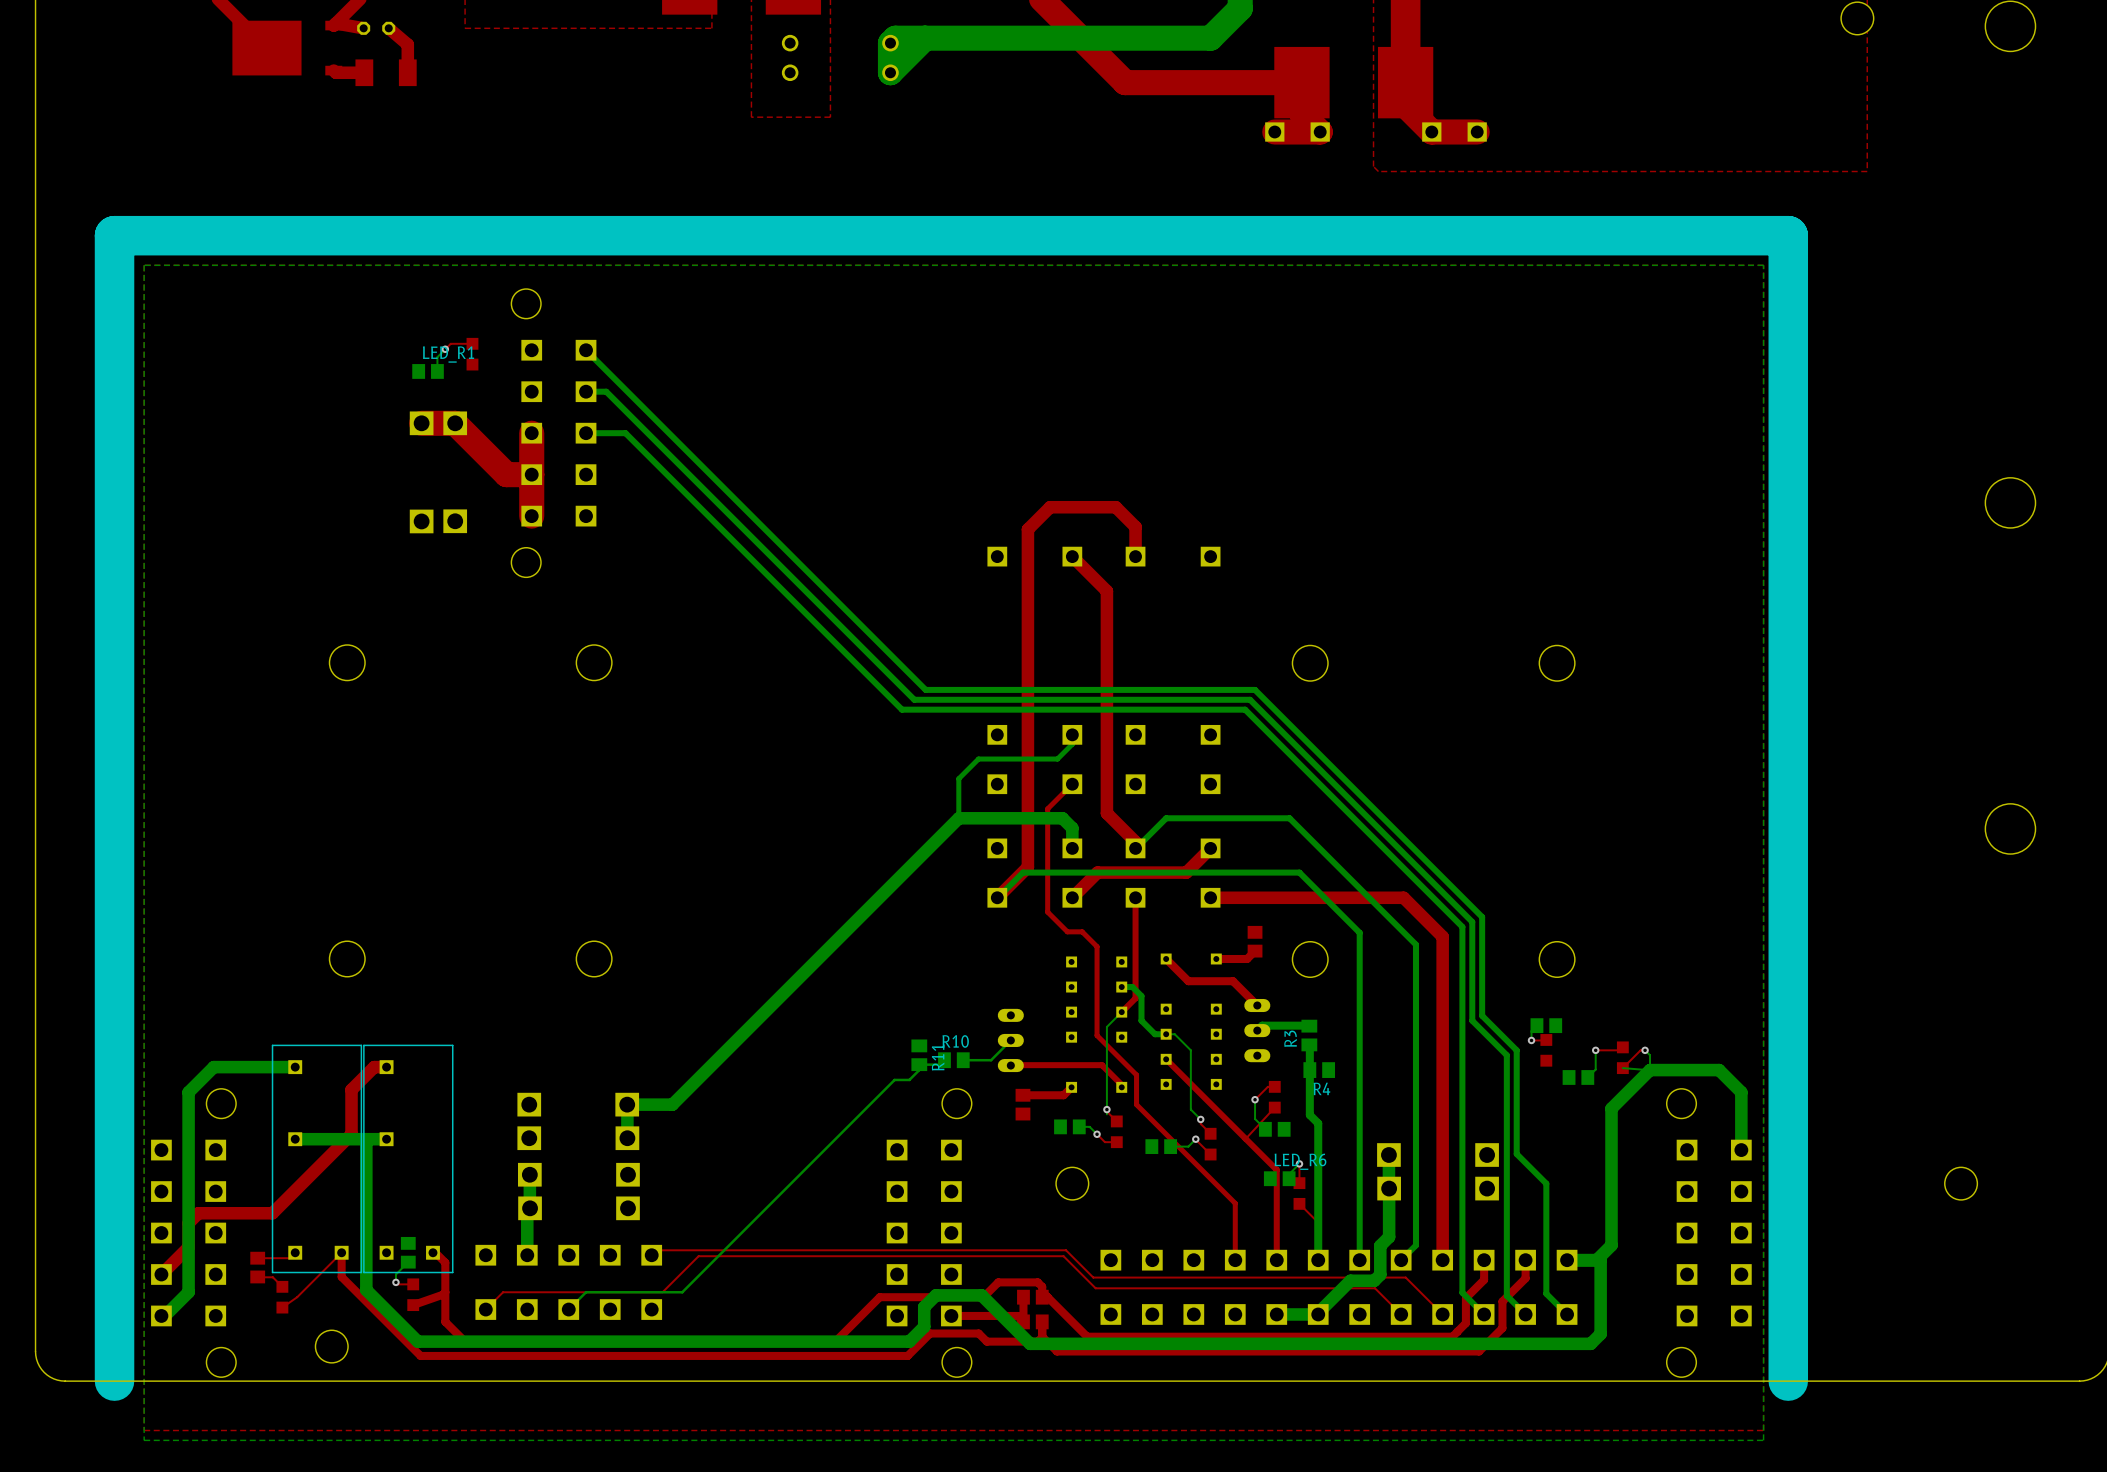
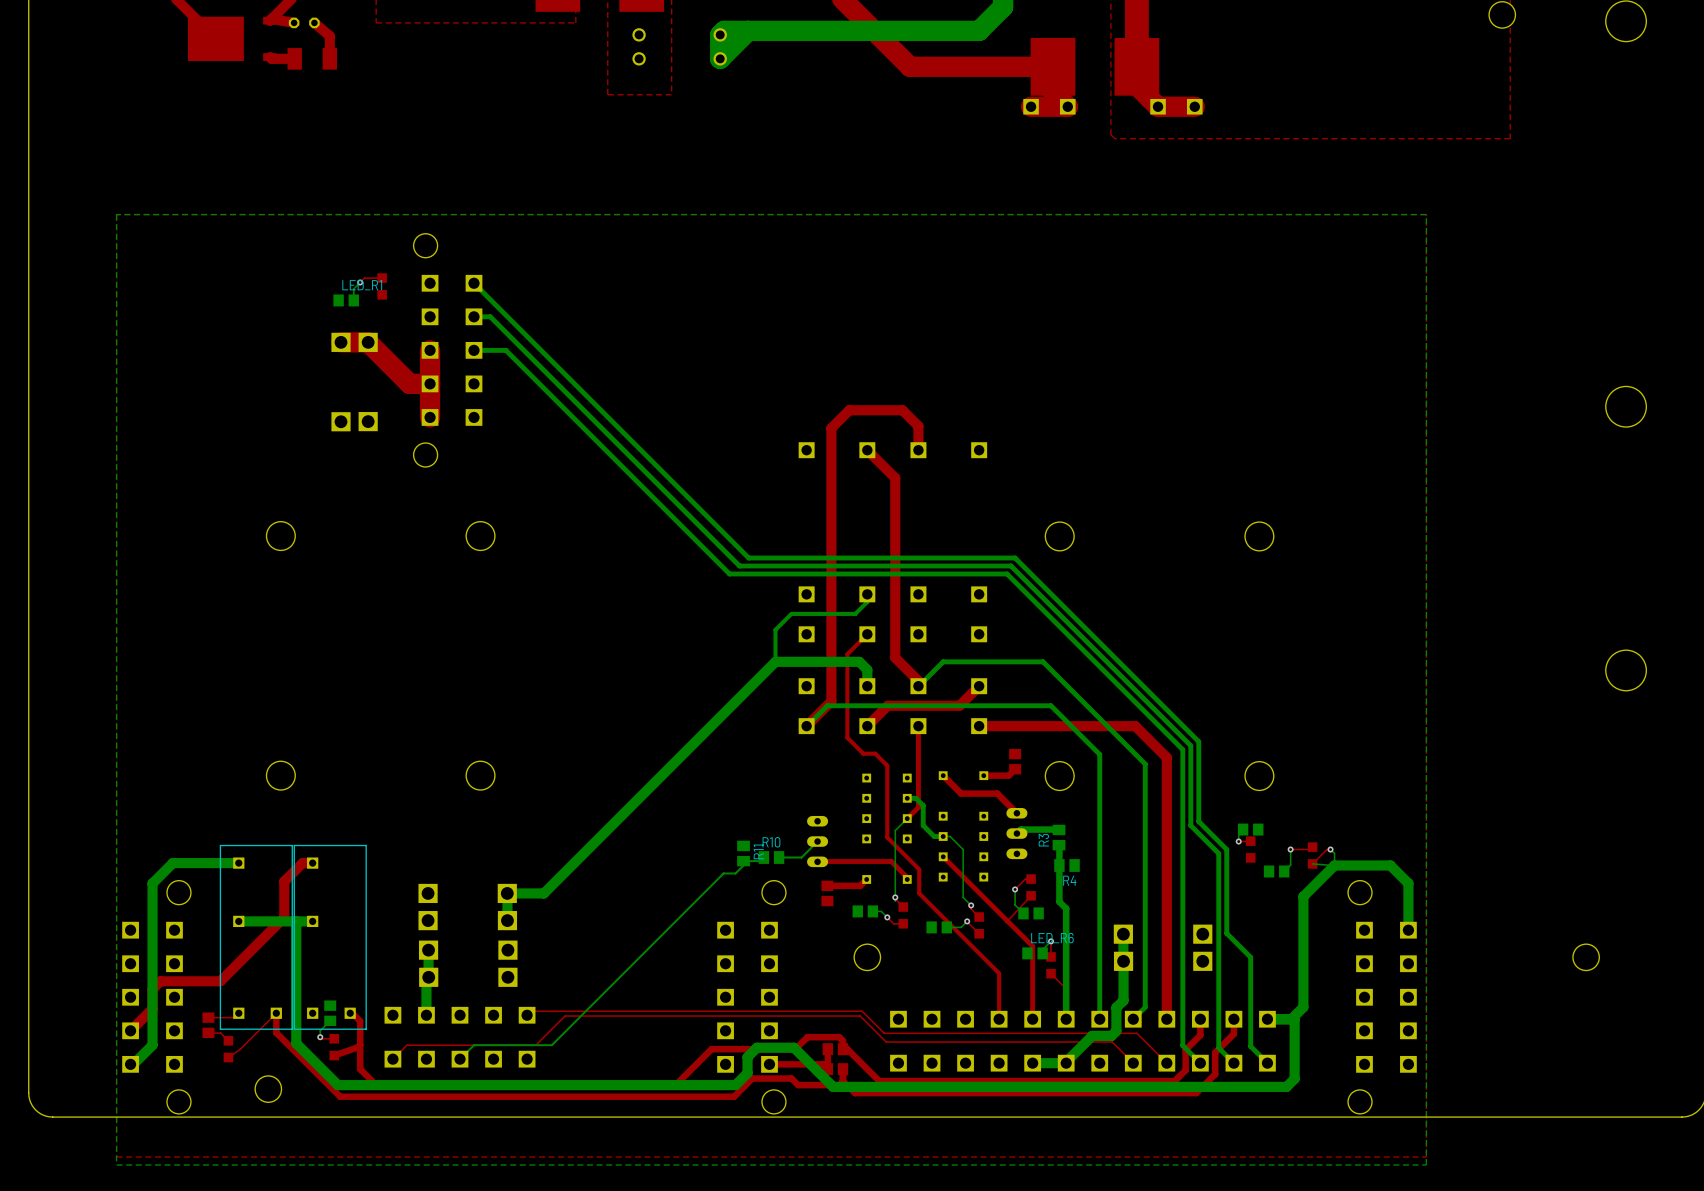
line: (1788, 1381) (1788, 235) (114, 235) (114, 1381) -> none

